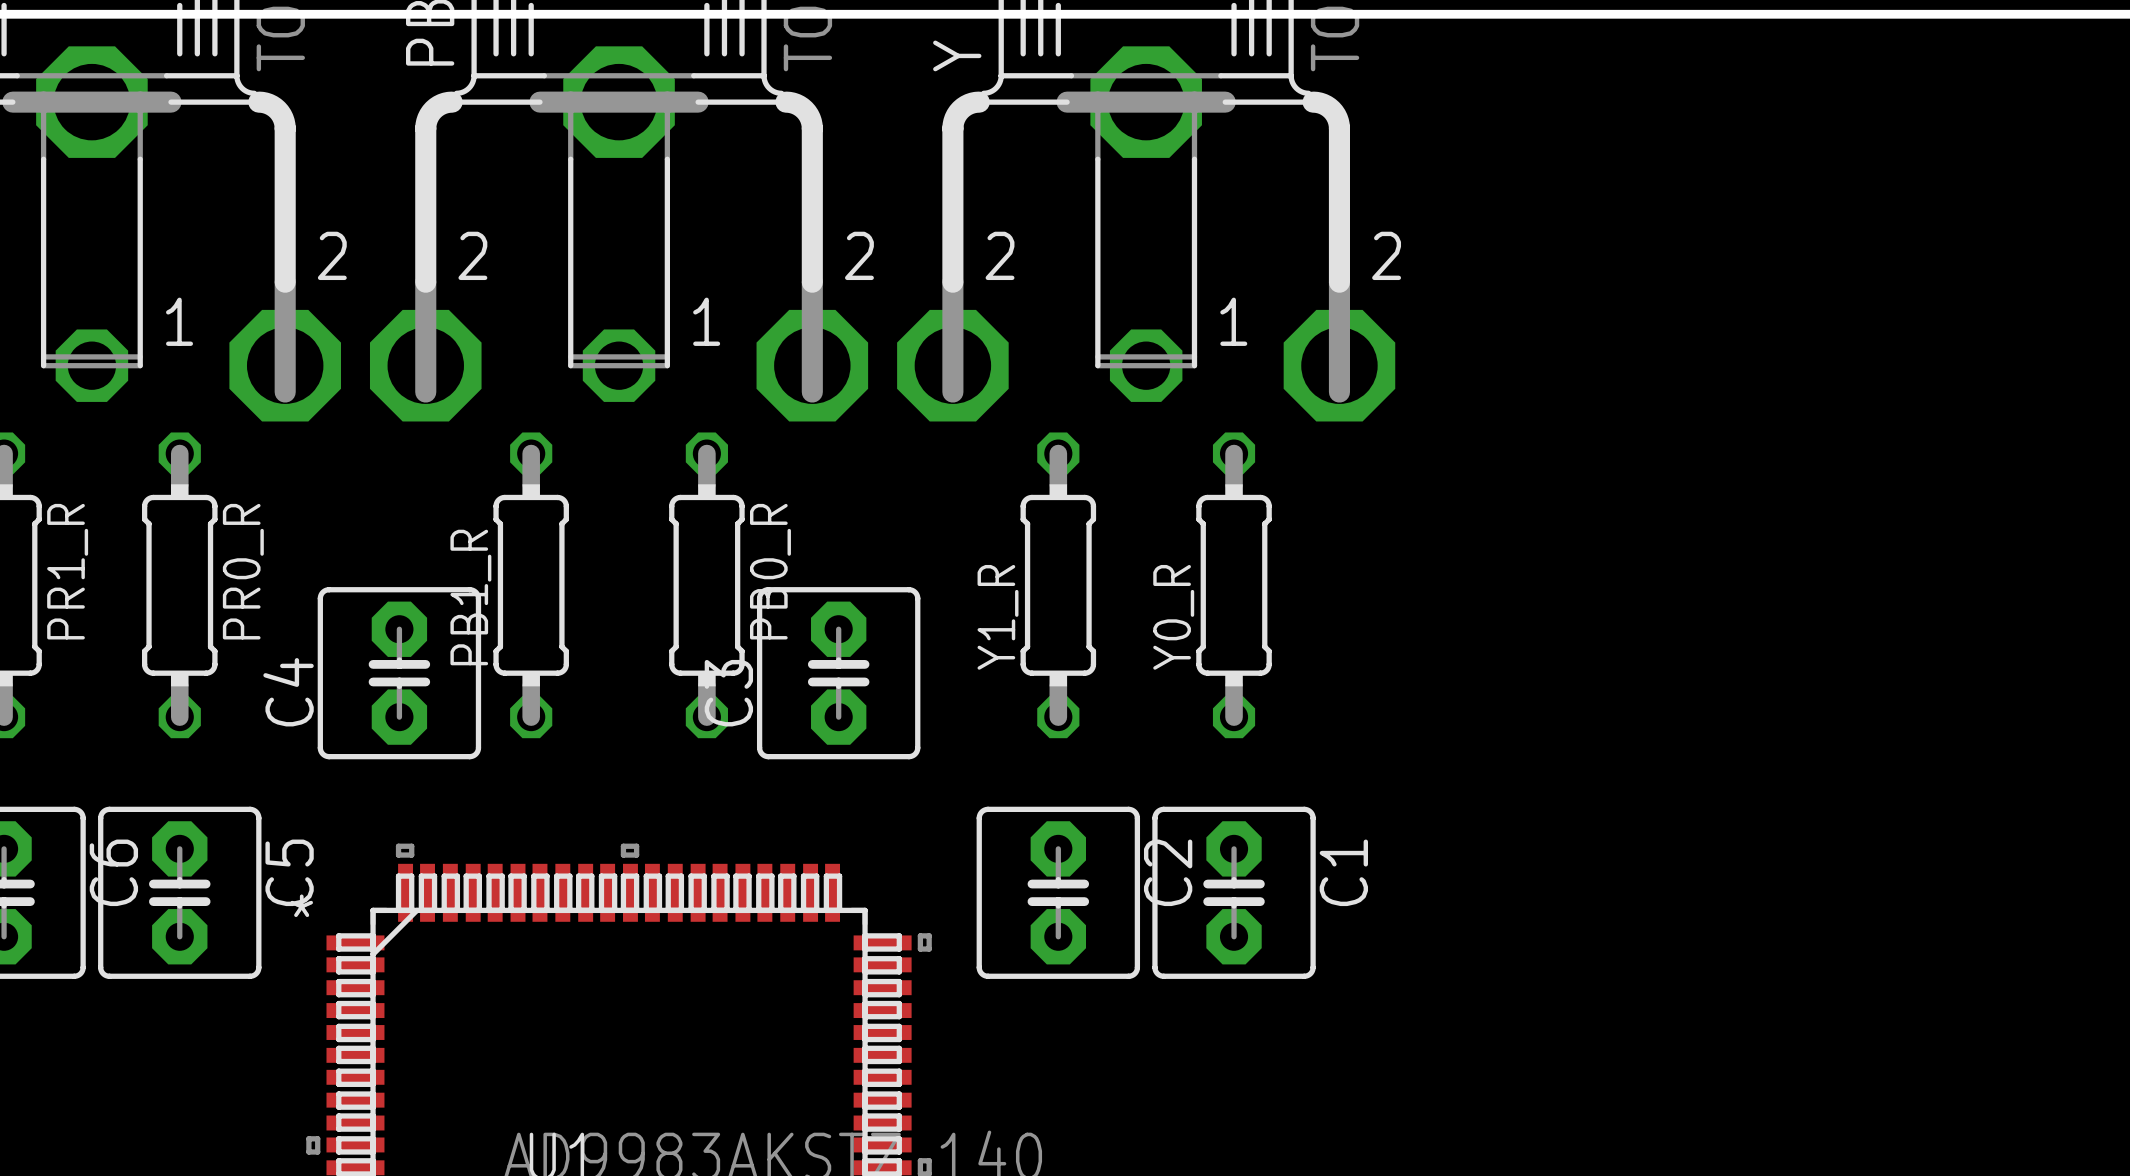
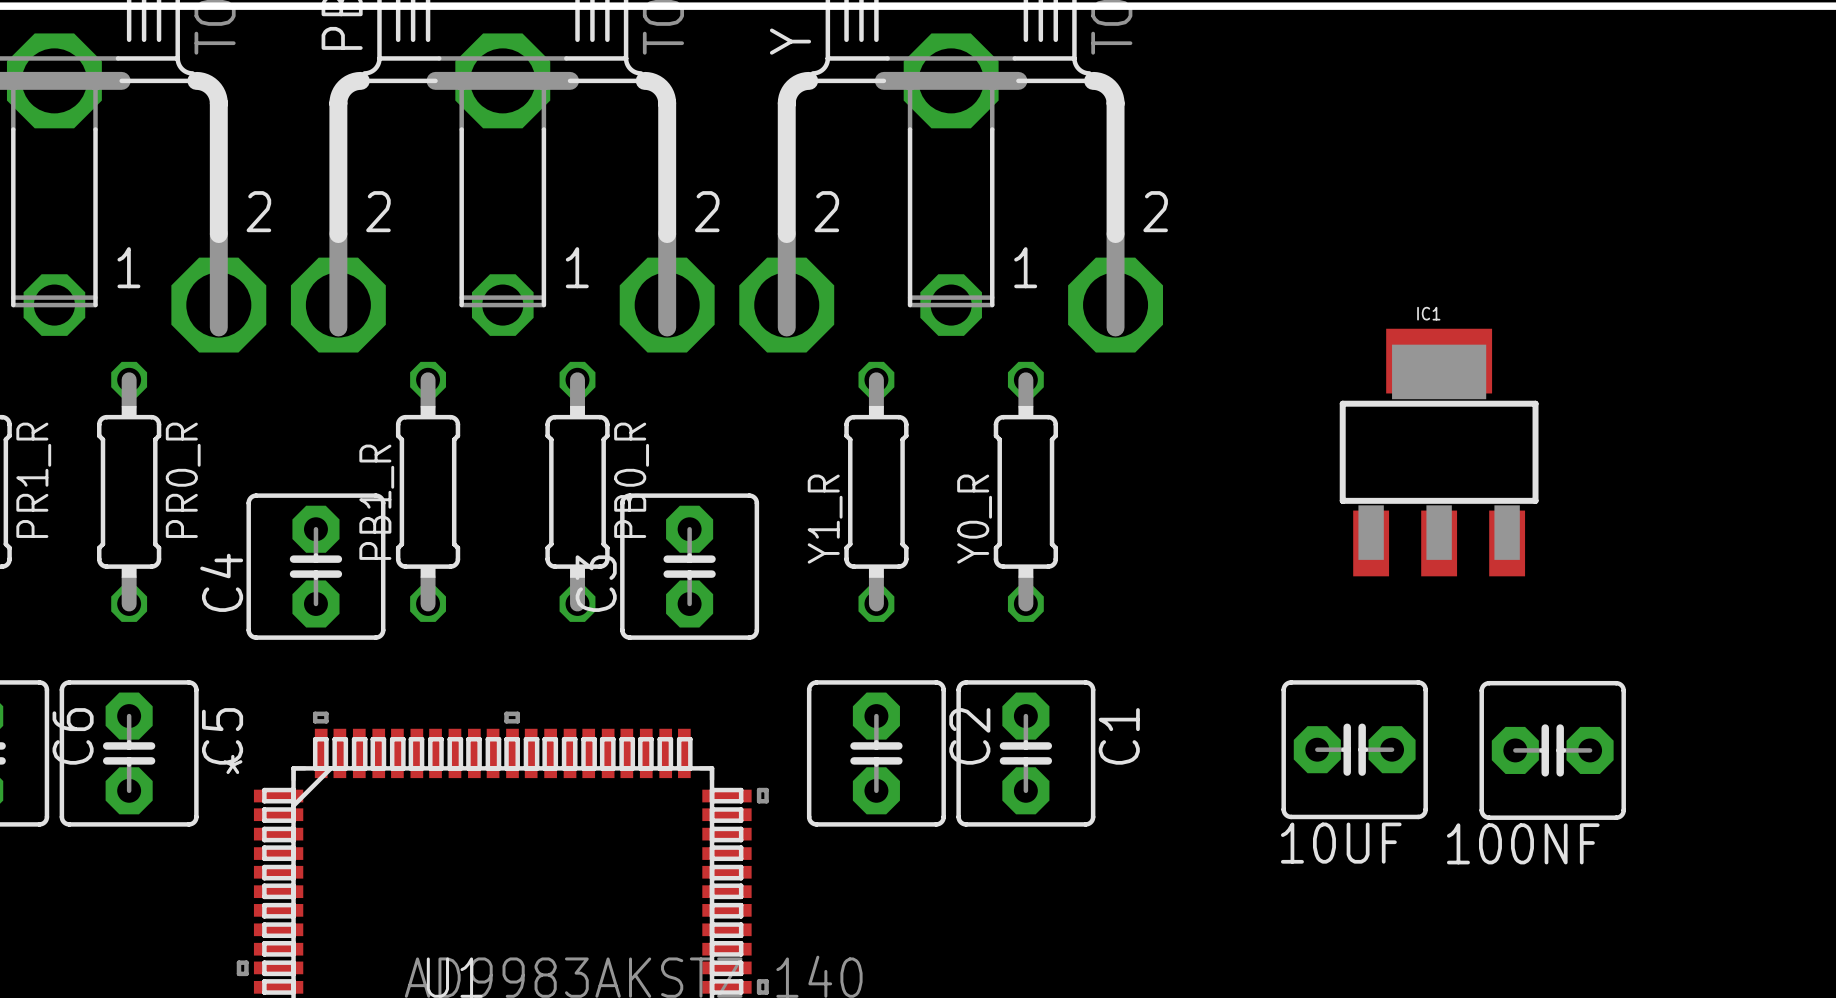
IC1: none -> (1439, 452)
10UF: none -> (1354, 749)
100NF: none -> (1552, 750)

